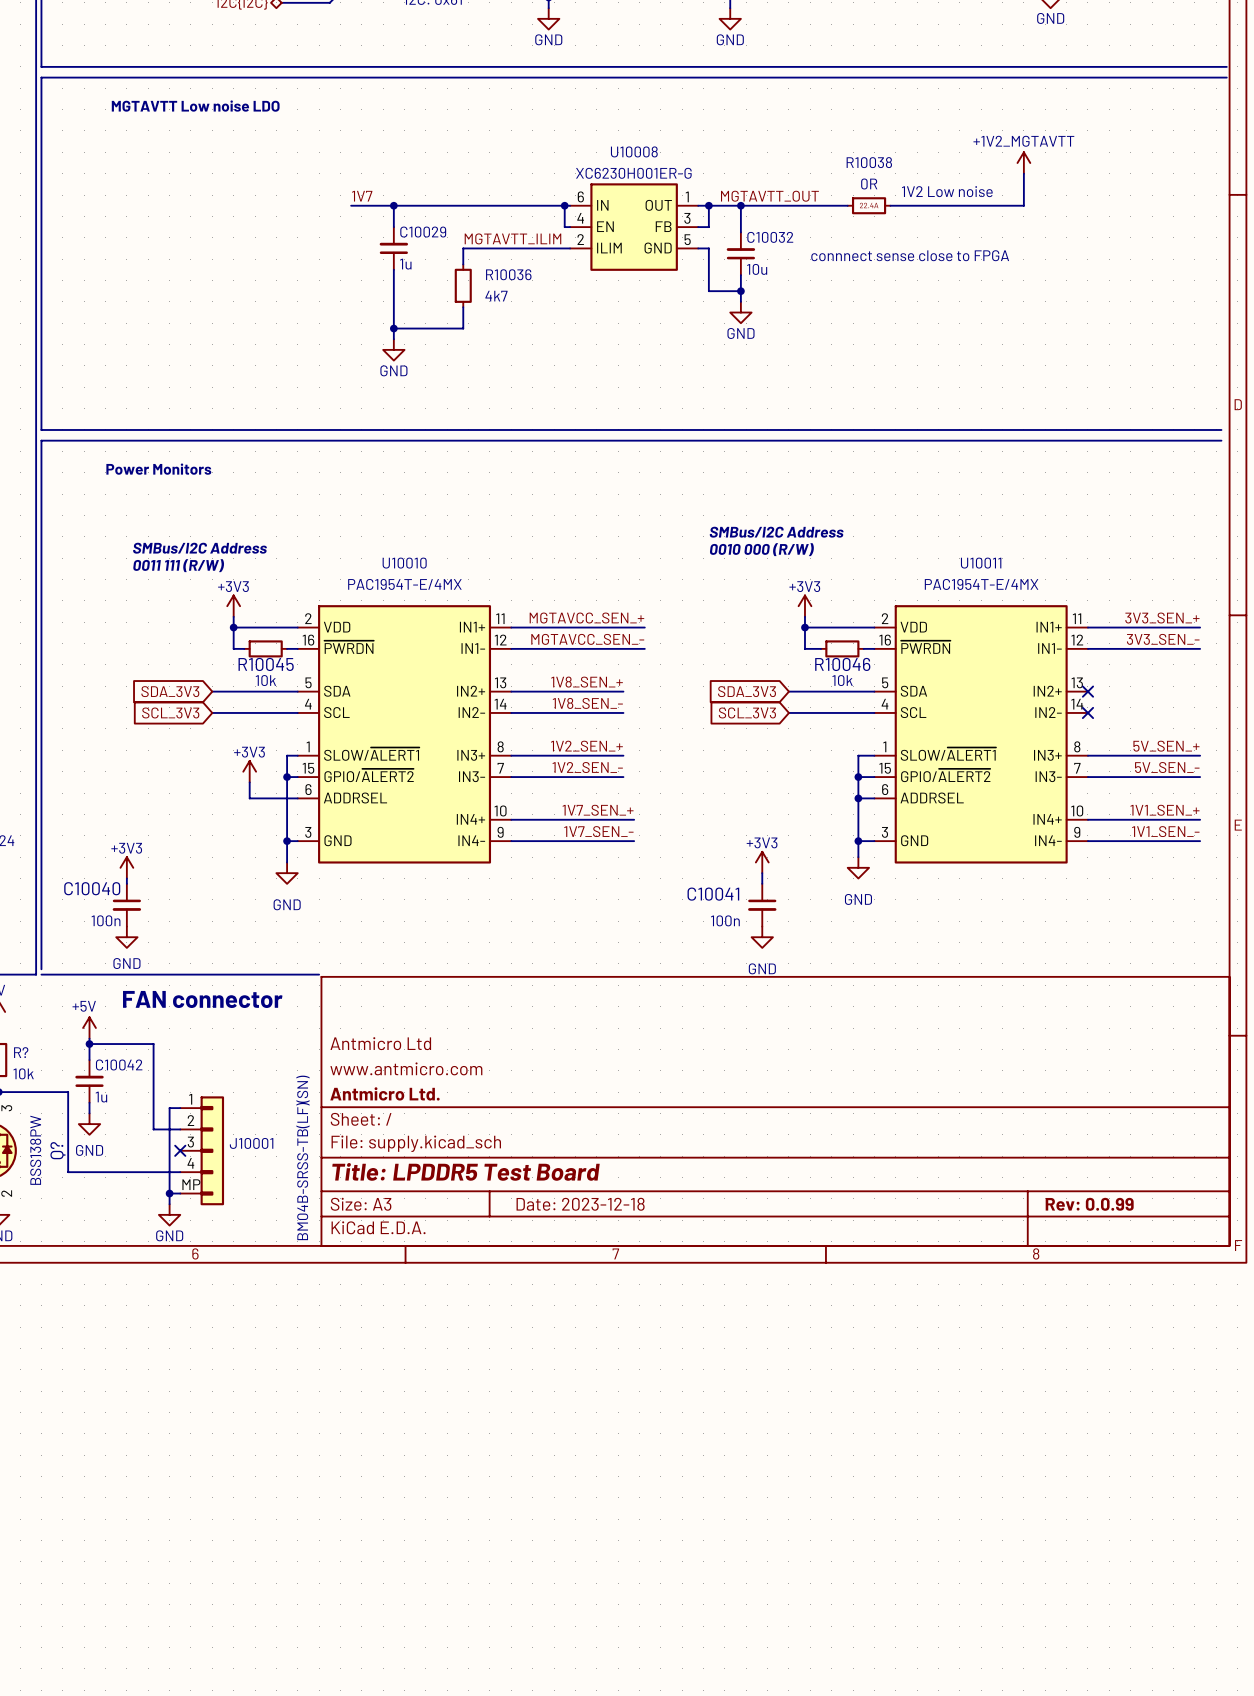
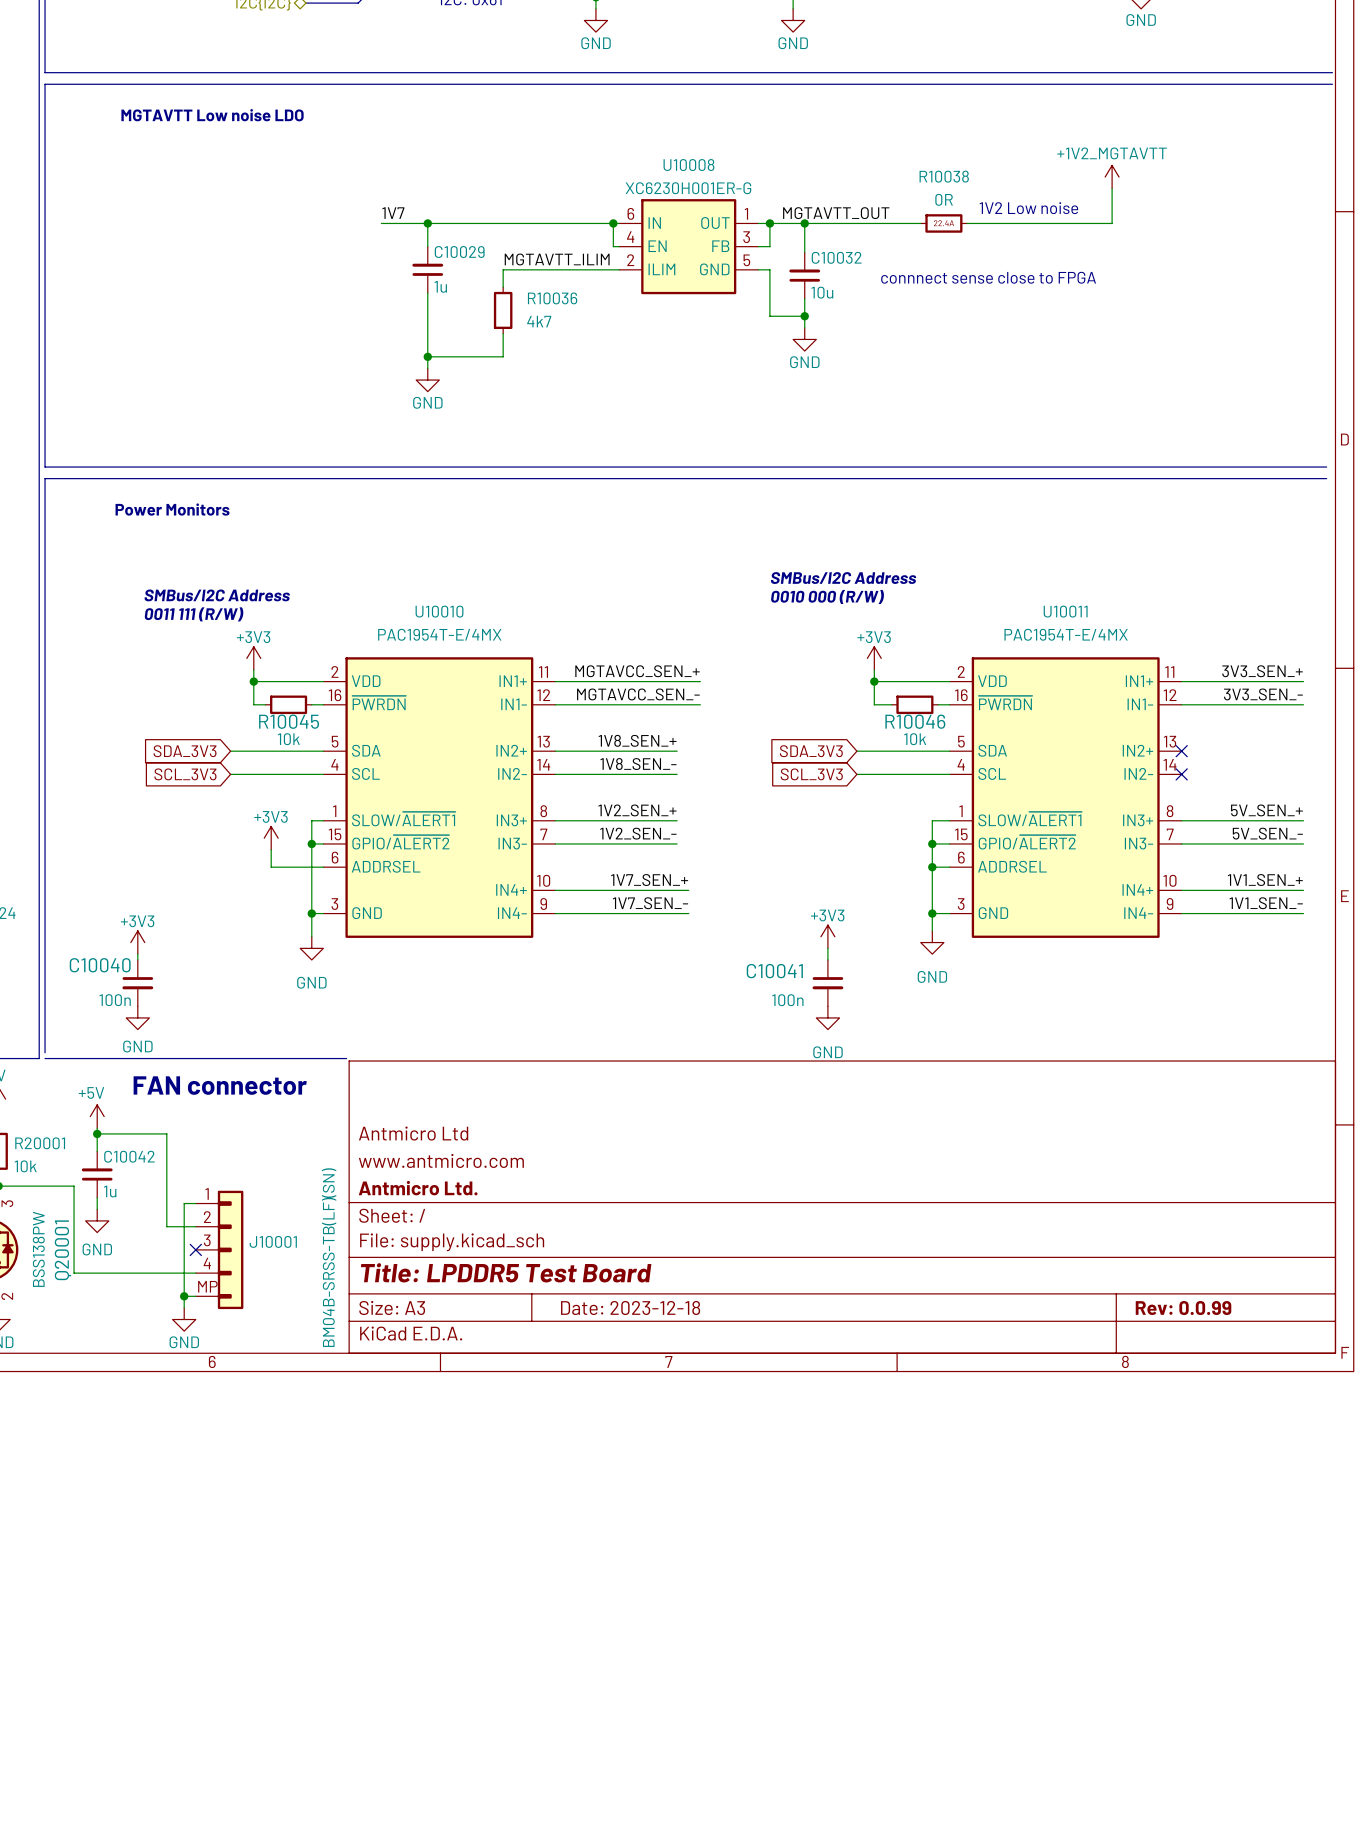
R? name: R? (21, 1052) -> R20001 (40, 1143)
Q? name: Q? (57, 1150) -> Q20001 (62, 1250)

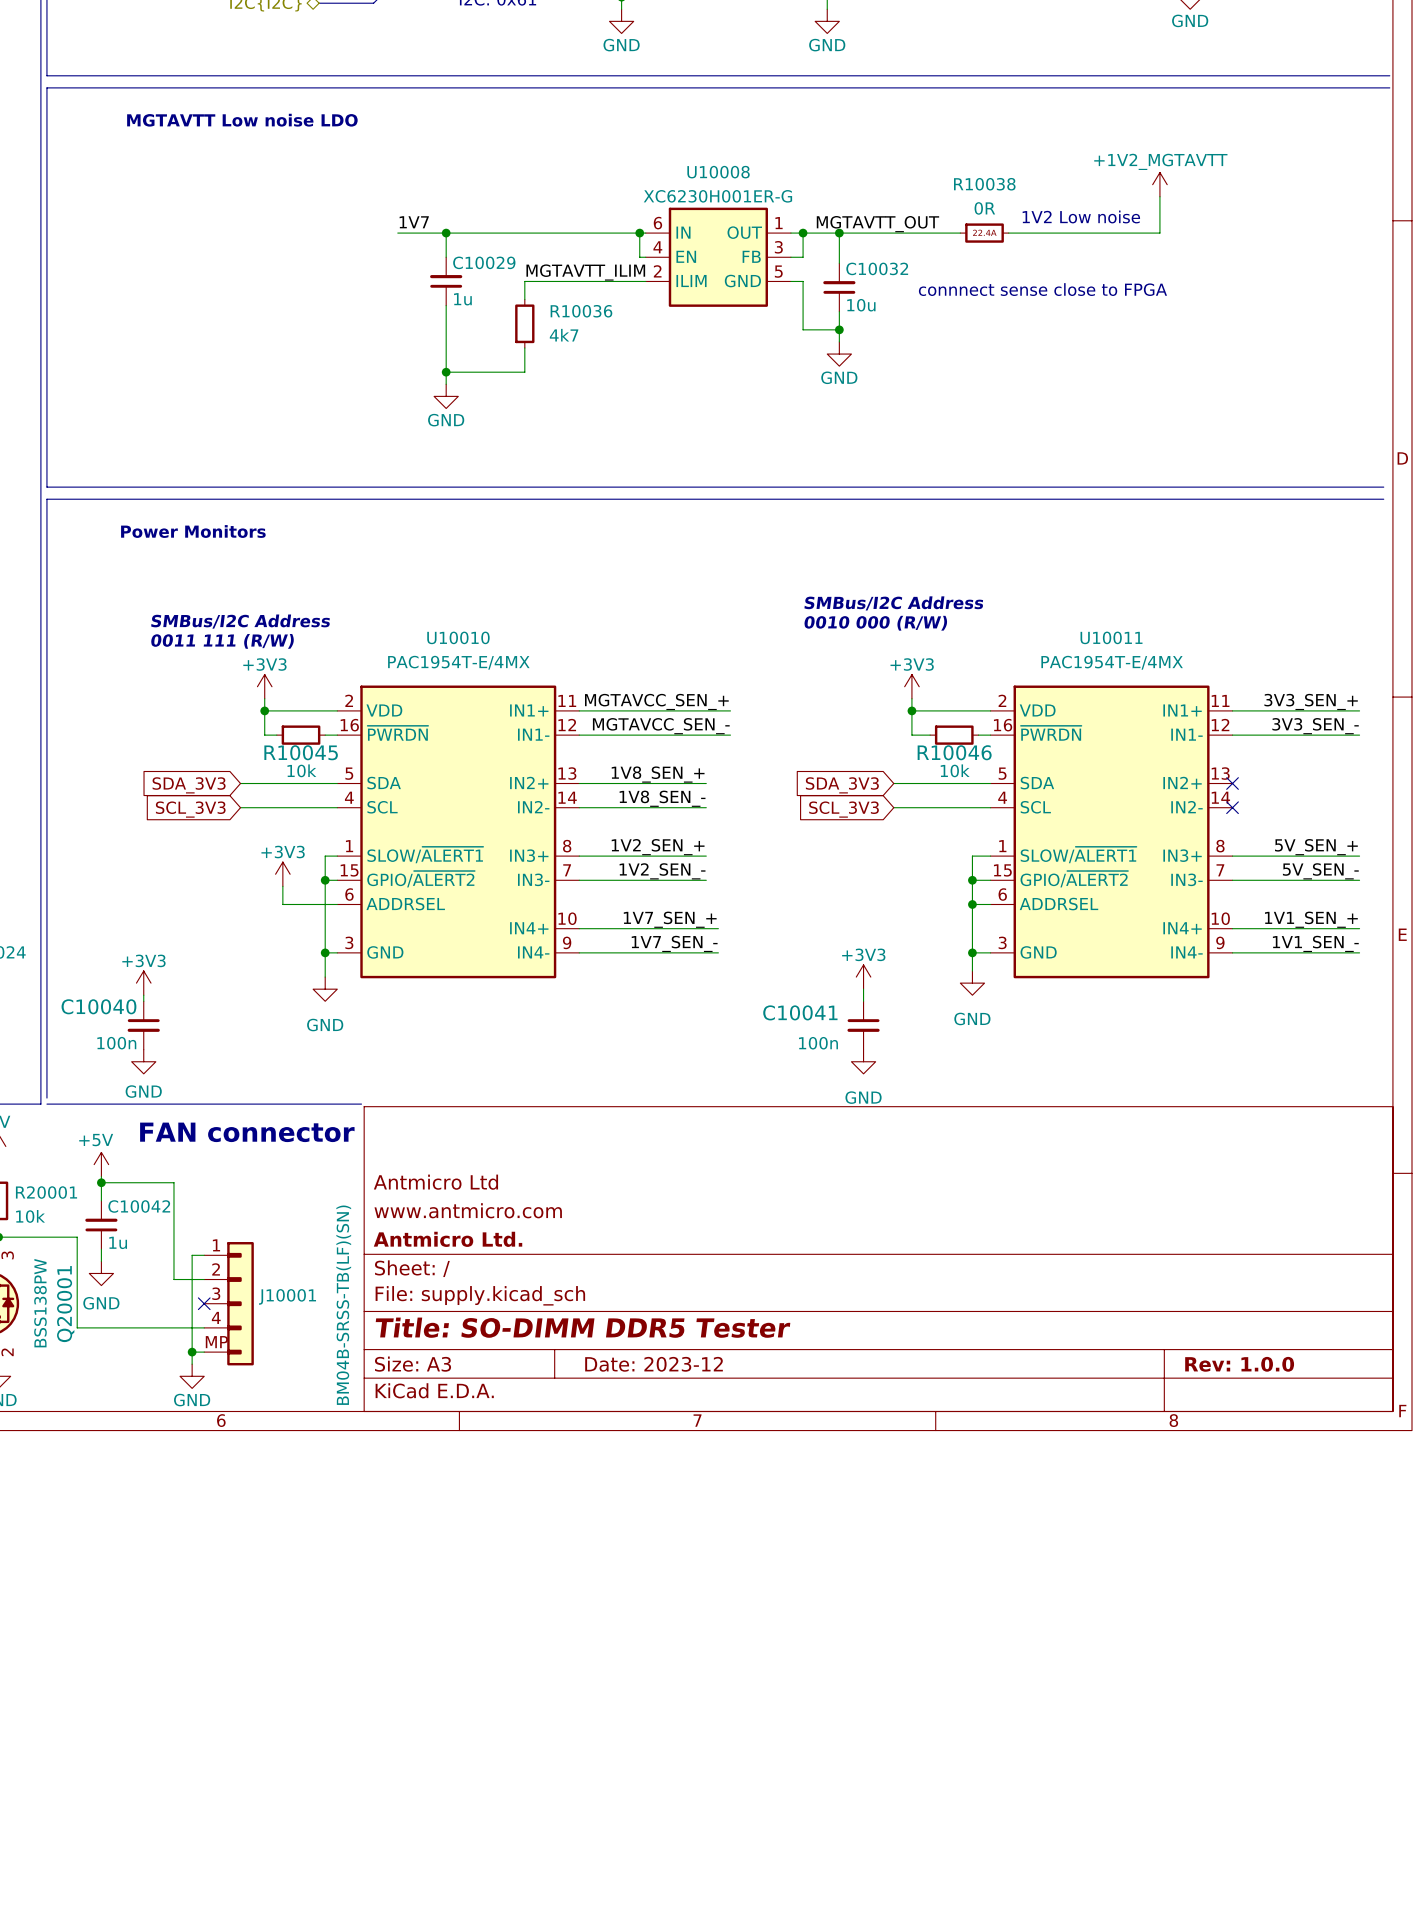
title block: Title: LPDDR5 Test Board (506, 1272) -> Title: SO-DIMM DDR5 Tester (583, 1327)
title block: Date: 2023-12-18 (630, 1308) -> Date: 2023-12 (654, 1364)
title block: Rev: 0.0.99 (1183, 1308) -> Rev: 1.0.0 (1239, 1364)

